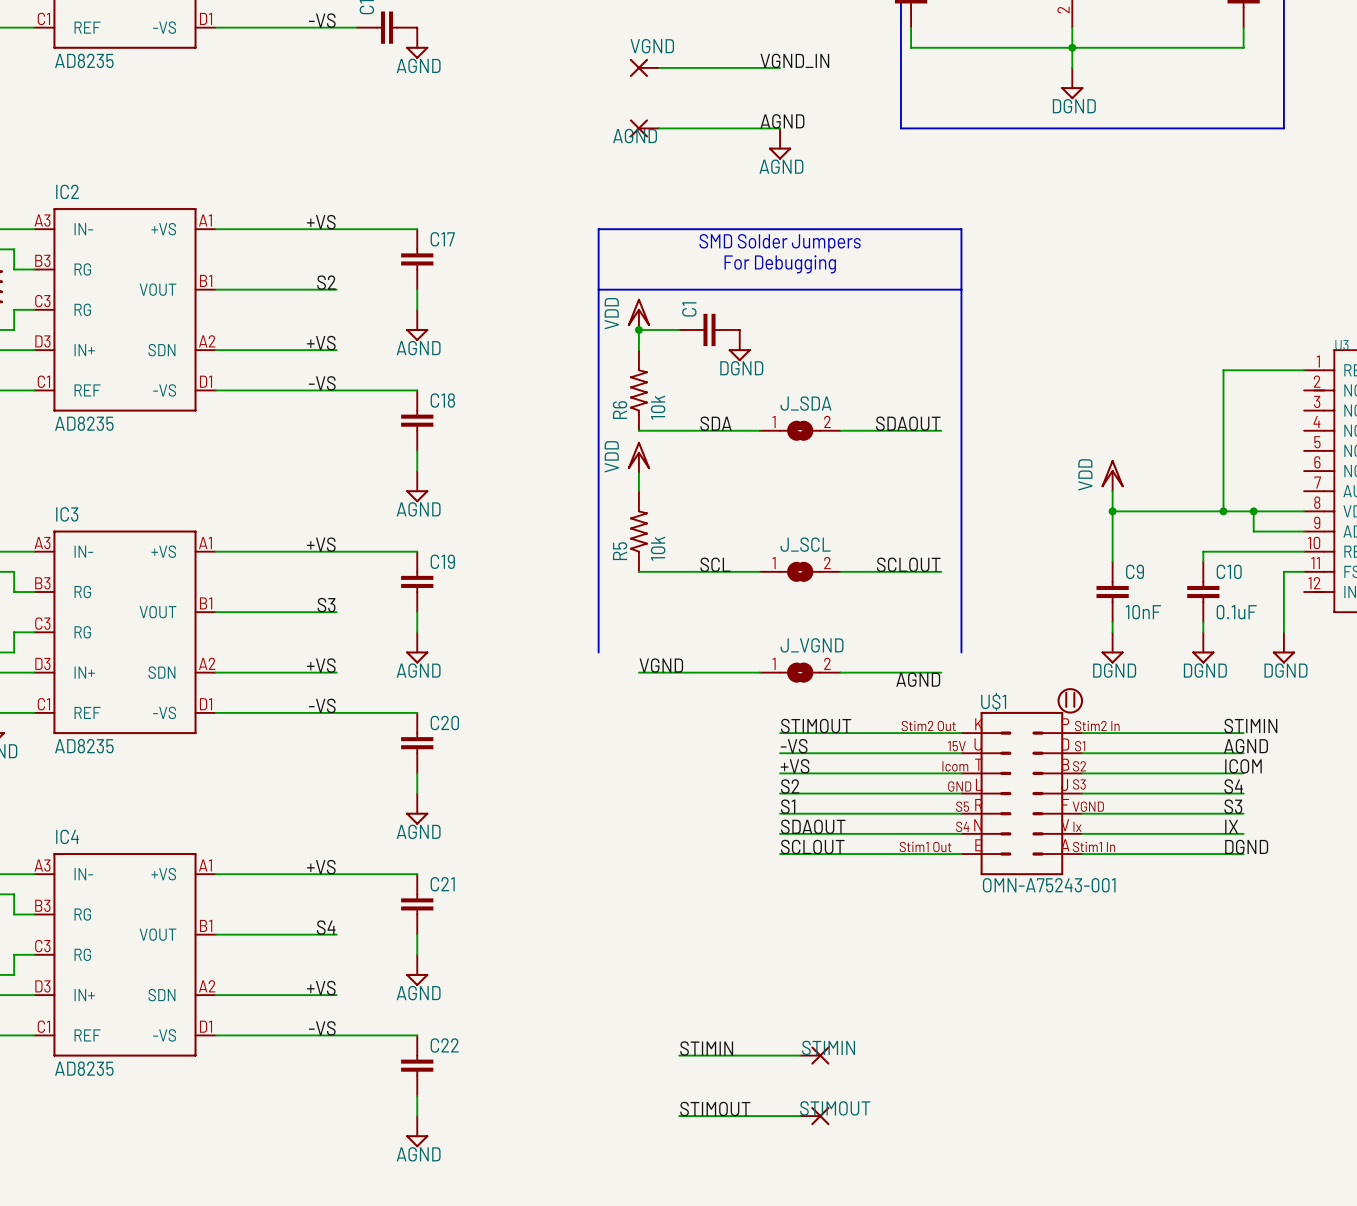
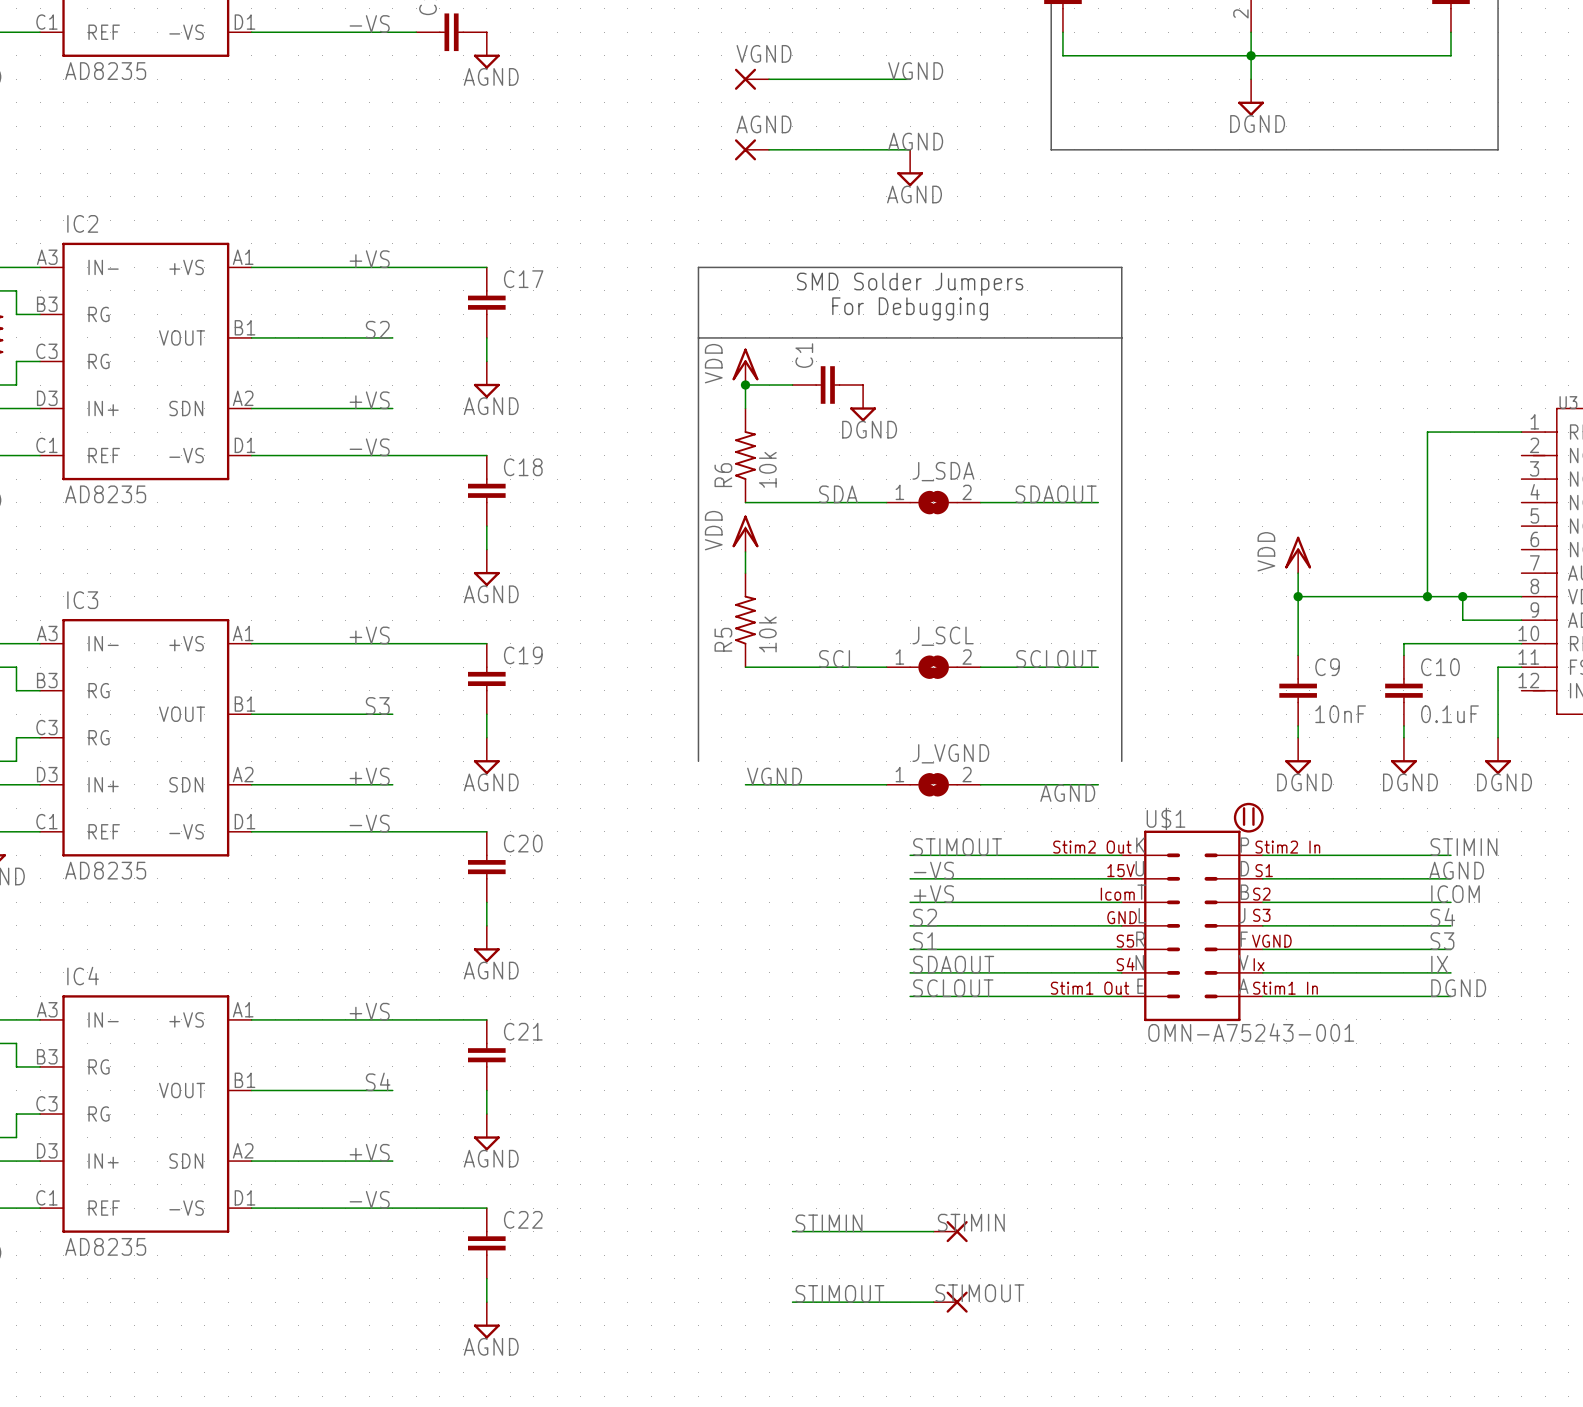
label: VGND_IN (794, 60) -> VGND (915, 71)
AGND name position: AGND (635, 136) -> AGND (764, 124)

